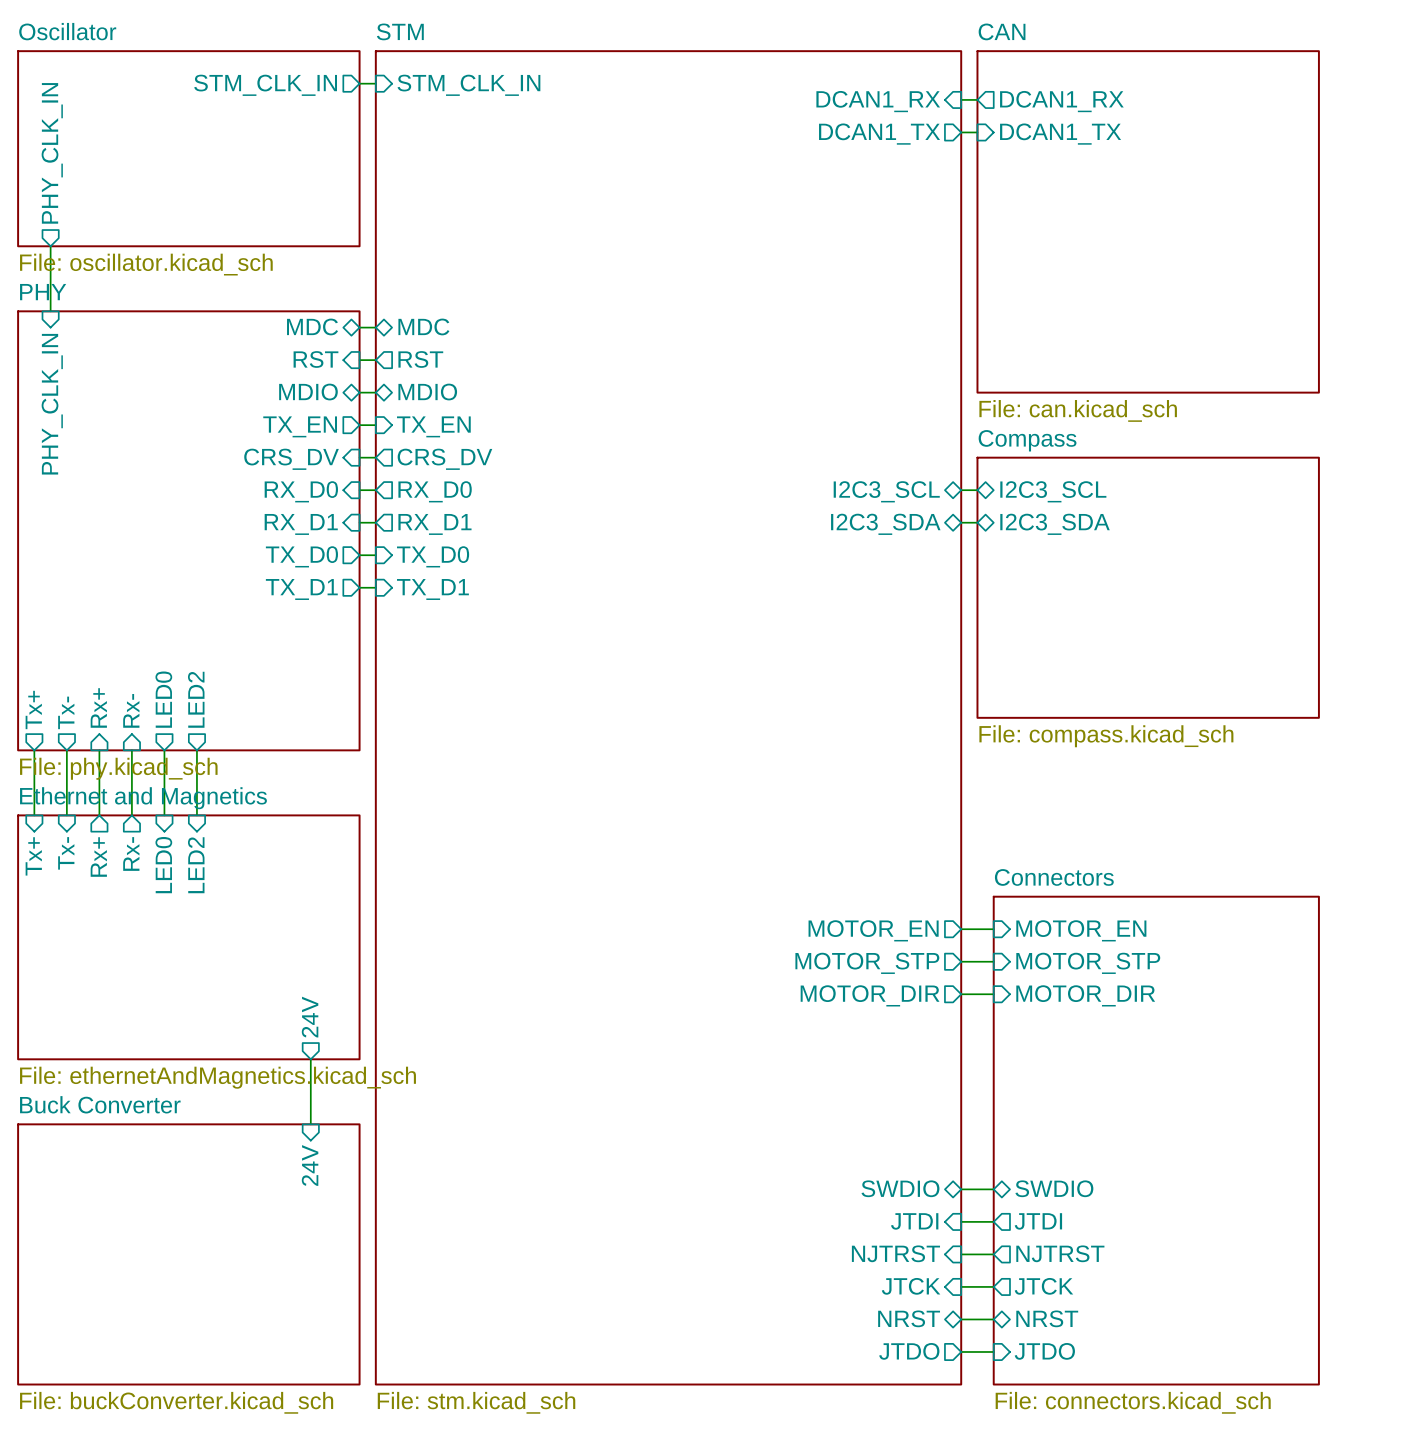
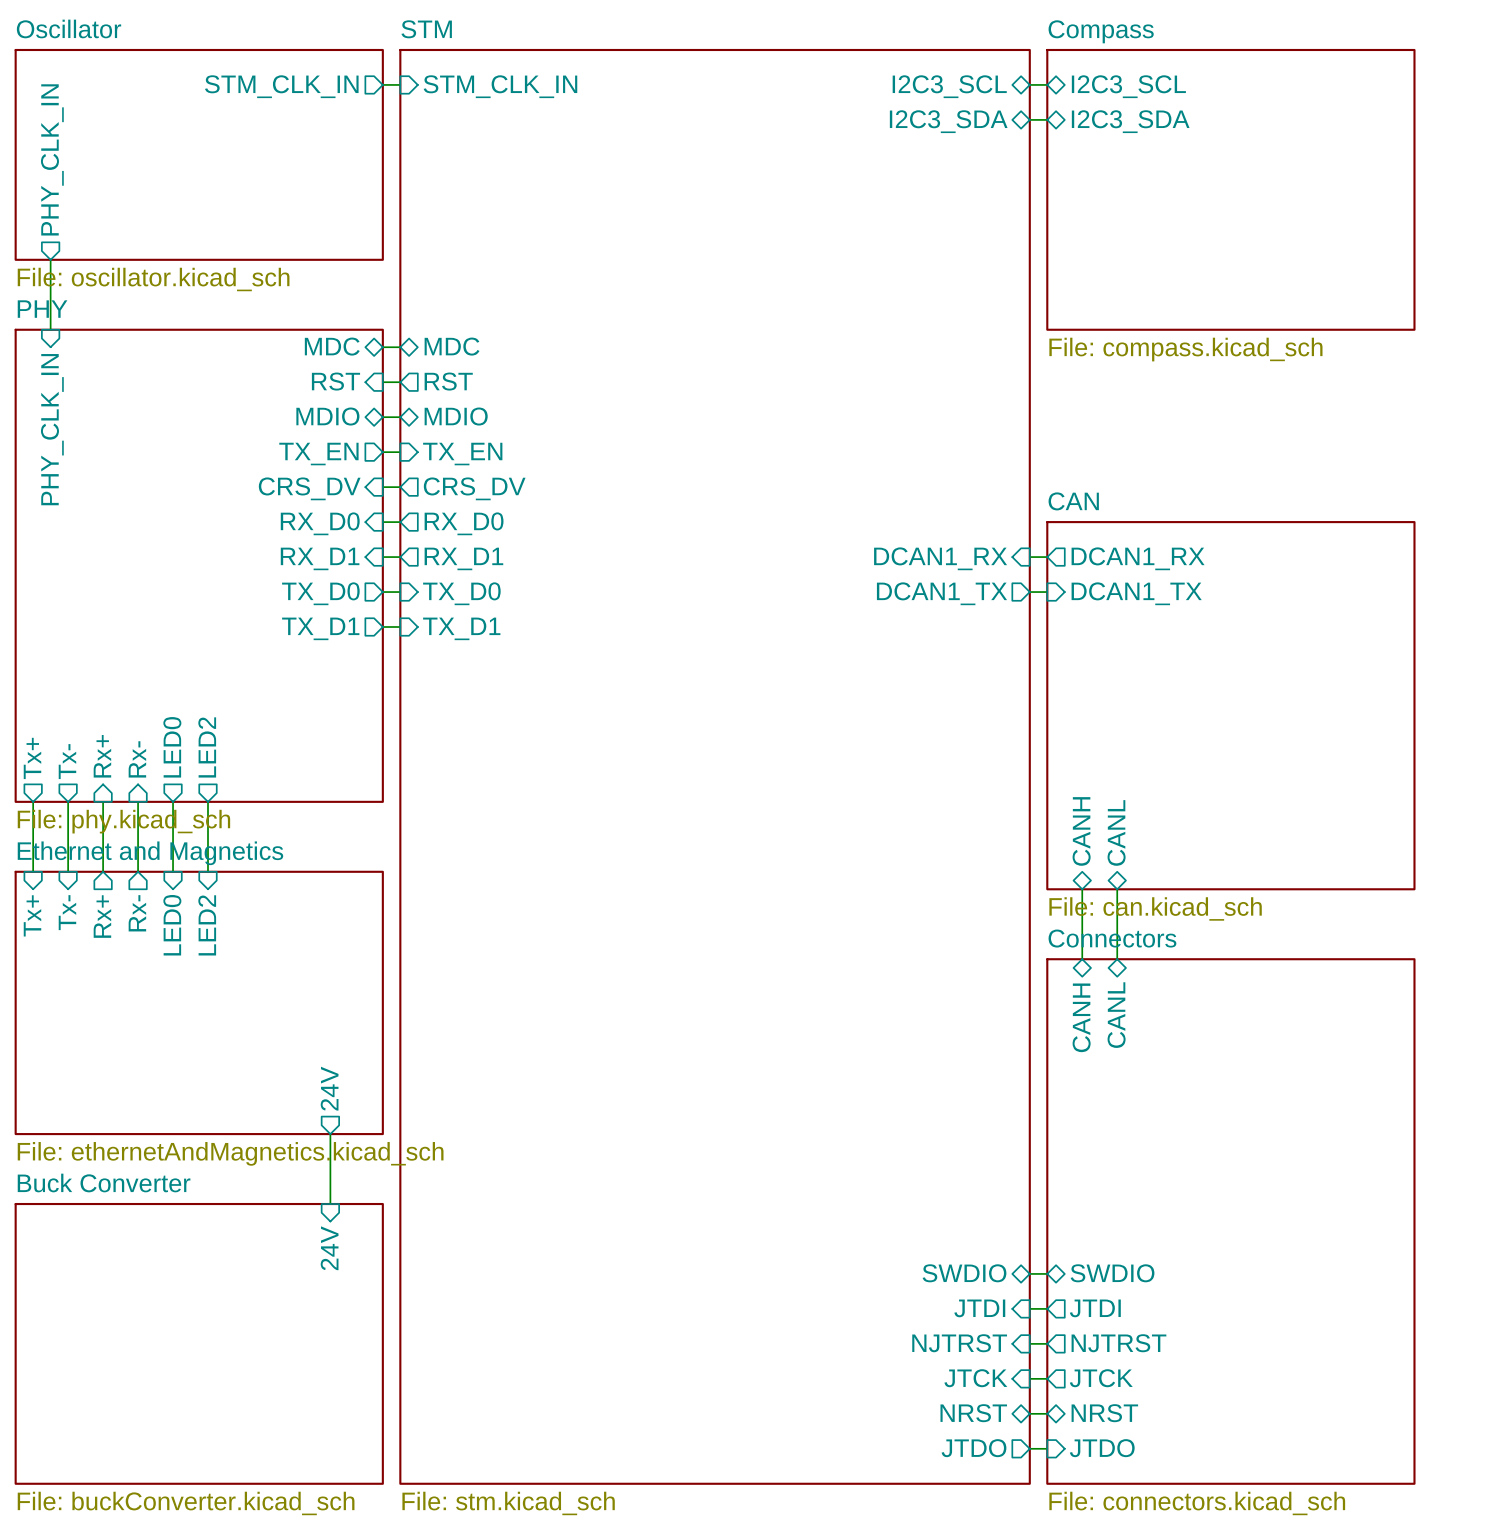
sheet pin: none -> I2C3_SCL (949, 86)
sheet pin: none -> I2C3_SCL (1128, 86)
wire: (961, 99) (977, 99) -> (1029, 84) (1047, 84)
sheet pin: DCAN1_RX (878, 101) -> none
sheet pin: DCAN1_RX (1061, 101) -> none
sheet pin: none -> I2C3_SDA (948, 121)
sheet pin: none -> I2C3_SDA (1130, 121)
wire: (961, 132) (977, 132) -> (1029, 119) (1047, 119)
sheet pin: DCAN1_TX (879, 134) -> none
sheet pin: DCAN1_TX (1060, 134) -> none
sheet Compass: none -> File: compass.kicad_sch (1230, 189)
sheet CAN: File: can.kicad_sch (1148, 221) -> none
wire: (961, 490) (977, 490) -> (1029, 592) (1047, 592)
sheet pin: I2C3_SCL (886, 491) -> none
sheet pin: I2C3_SCL (1053, 491) -> none
sheet pin shape: bidirectional (885, 524) -> input (940, 558)
sheet pin: I2C3_SDA (885, 524) -> DCAN1_RX (940, 558)
sheet pin shape: bidirectional (1055, 524) -> output (1138, 558)
sheet pin: I2C3_SDA (1055, 524) -> DCAN1_RX (1138, 558)
sheet pin: none -> DCAN1_TX (941, 593)
sheet pin: none -> DCAN1_TX (1136, 593)
sheet Compass: File: compass.kicad_sch (1148, 587) -> none
sheet CAN: none -> File: can.kicad_sch (1230, 705)
sheet pin: none -> CANH (1081, 831)
sheet pin: none -> CANL (1116, 832)
wire: none -> (1082, 889) (1082, 959)
wire: none -> (1117, 889) (1117, 959)
sheet Connectors shape: [992, 895, 1320, 1386] -> [1046, 958, 1416, 1485]
wire: (961, 929) (993, 929) -> none
sheet pin: MOTOR_EN (873, 930) -> none
sheet pin shape: input (1081, 930) -> bidirectional (1081, 1017)
sheet pin: MOTOR_EN (1081, 930) -> CANH (1081, 1017)
sheet pin: none -> CANL (1116, 1015)
wire: (961, 961) (993, 961) -> none
sheet pin: MOTOR_STP (867, 963) -> none
sheet pin: MOTOR_STP (1088, 963) -> none
wire: (961, 994) (993, 994) -> none
sheet pin: MOTOR_DIR (870, 995) -> none
sheet pin: MOTOR_DIR (1085, 995) -> none
sheet pin position: SWDIO (1054, 1188) -> SWDIO (1112, 1273)
wire: (977, 1189) (993, 1189) -> none
wire: (977, 1221) (993, 1221) -> none
sheet pin position: JTDI (1038, 1221) -> JTDI (1095, 1308)
sheet pin position: NJTRST (1060, 1253) -> NJTRST (1118, 1343)
wire: (977, 1254) (993, 1254) -> none
wire: (977, 1286) (993, 1286) -> none
sheet pin position: JTCK (1043, 1286) -> JTCK (1101, 1378)
sheet pin position: NRST (1047, 1318) -> NRST (1104, 1413)
wire: (977, 1319) (993, 1319) -> none
wire: (977, 1351) (993, 1351) -> none
sheet pin position: JTDO (1044, 1351) -> JTDO (1102, 1448)

